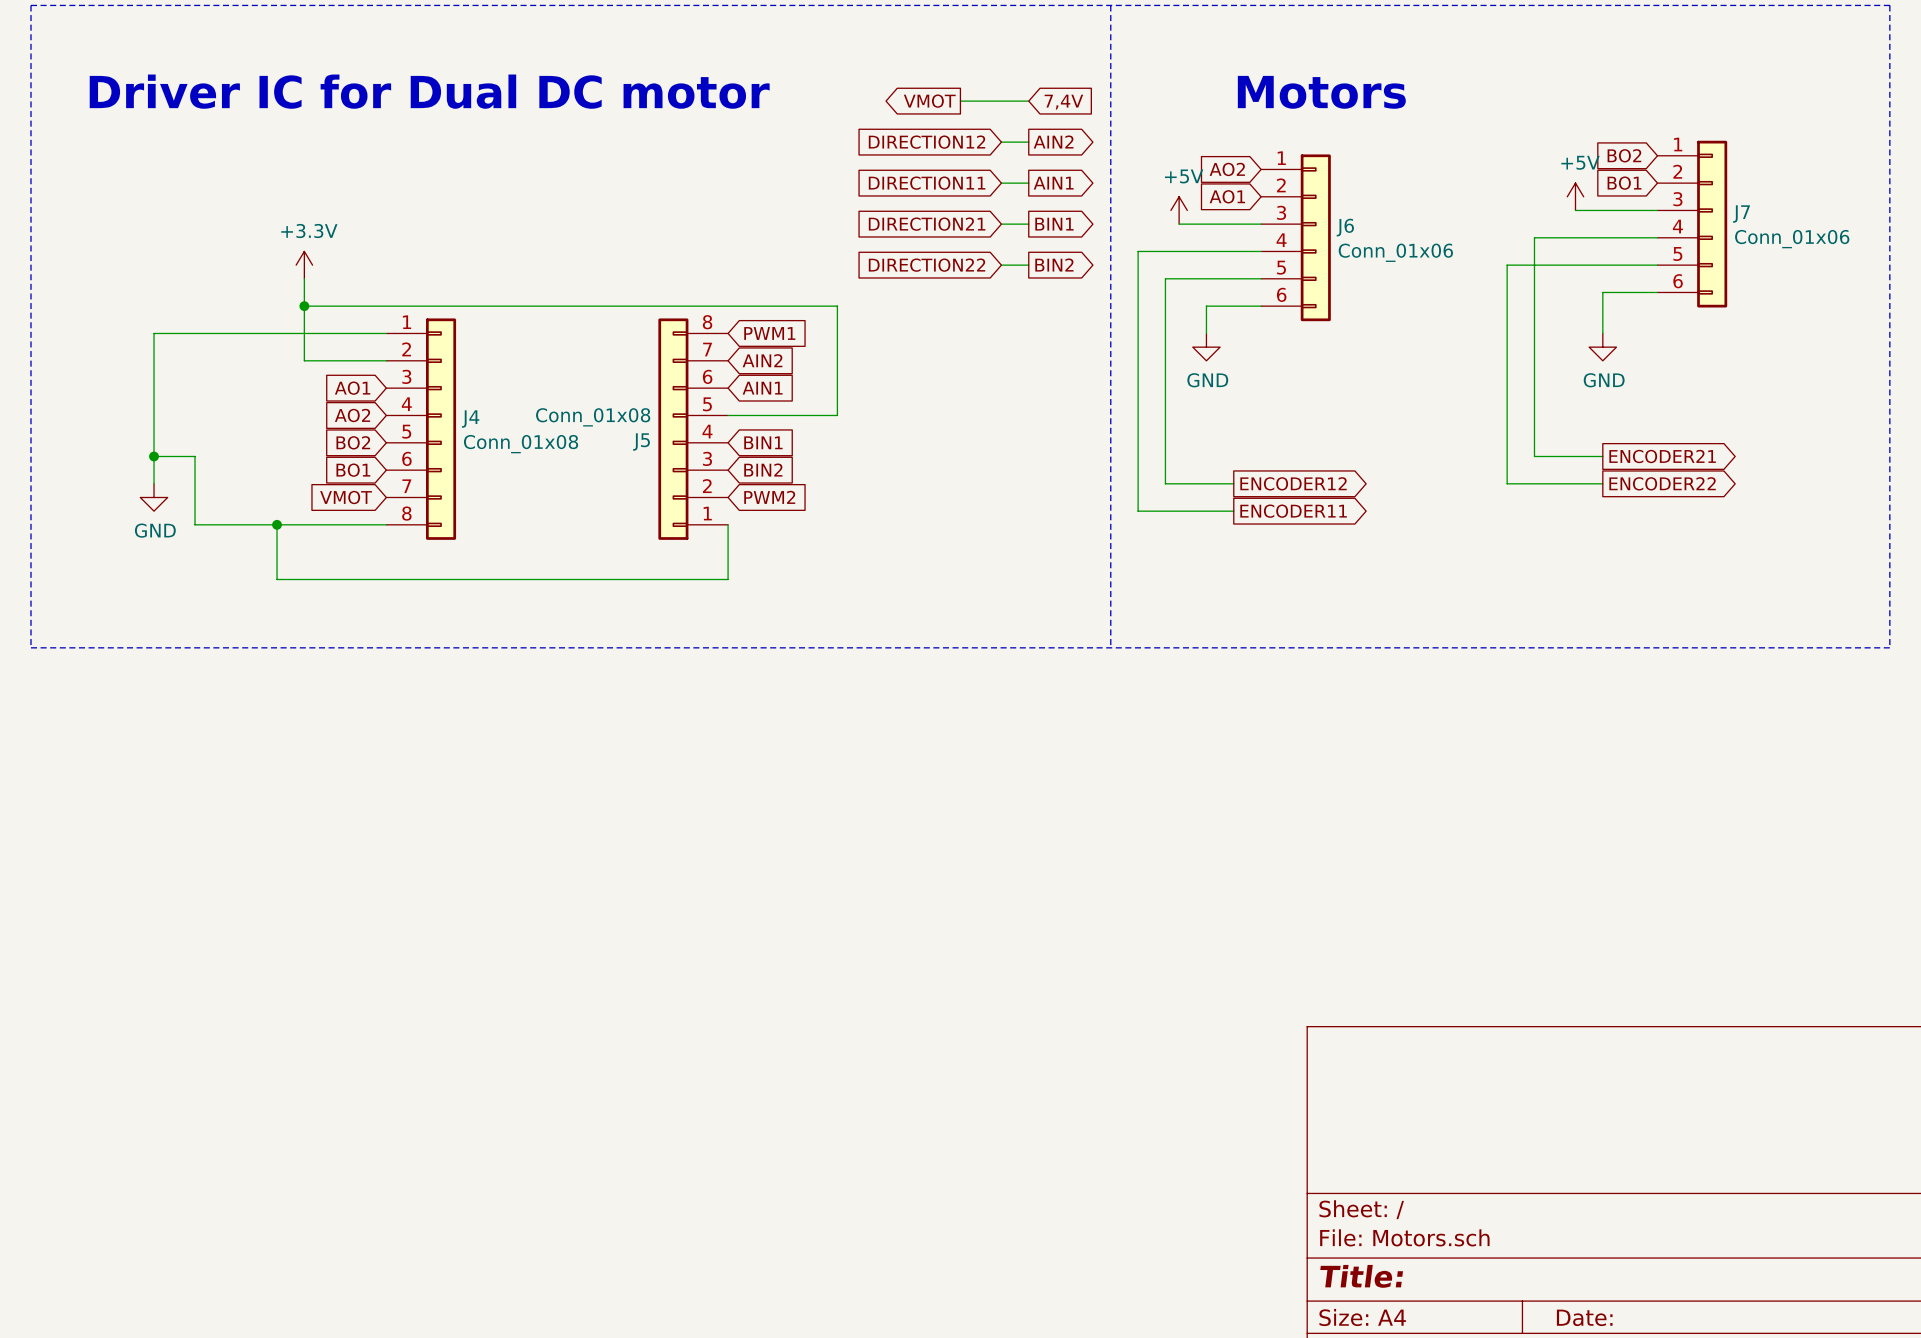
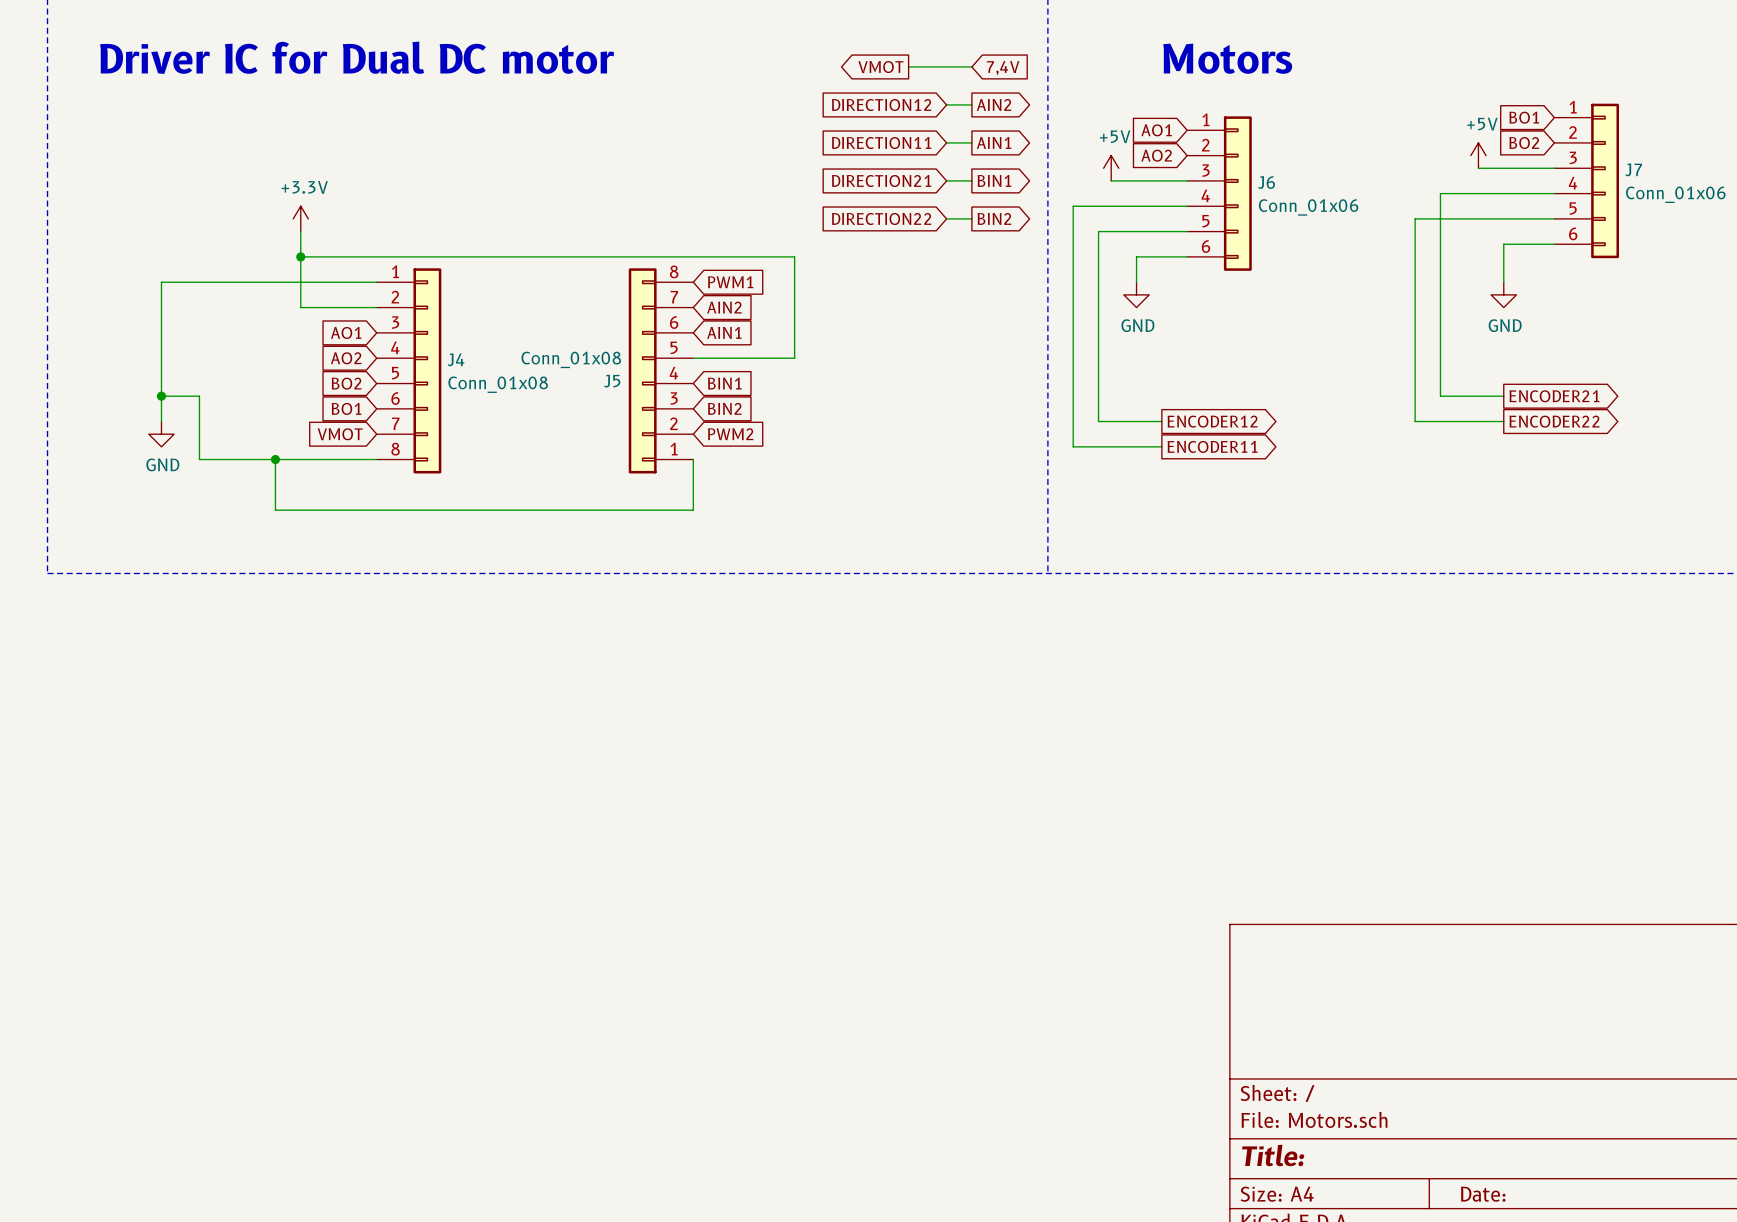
global label: BO2 (1624, 155) -> BO1 (1524, 117)
global label: AO2 (1227, 169) -> AO1 (1156, 130)
global label: BO1 (1624, 183) -> BO2 (1524, 143)
global label: AO1 (1227, 196) -> AO2 (1156, 155)

